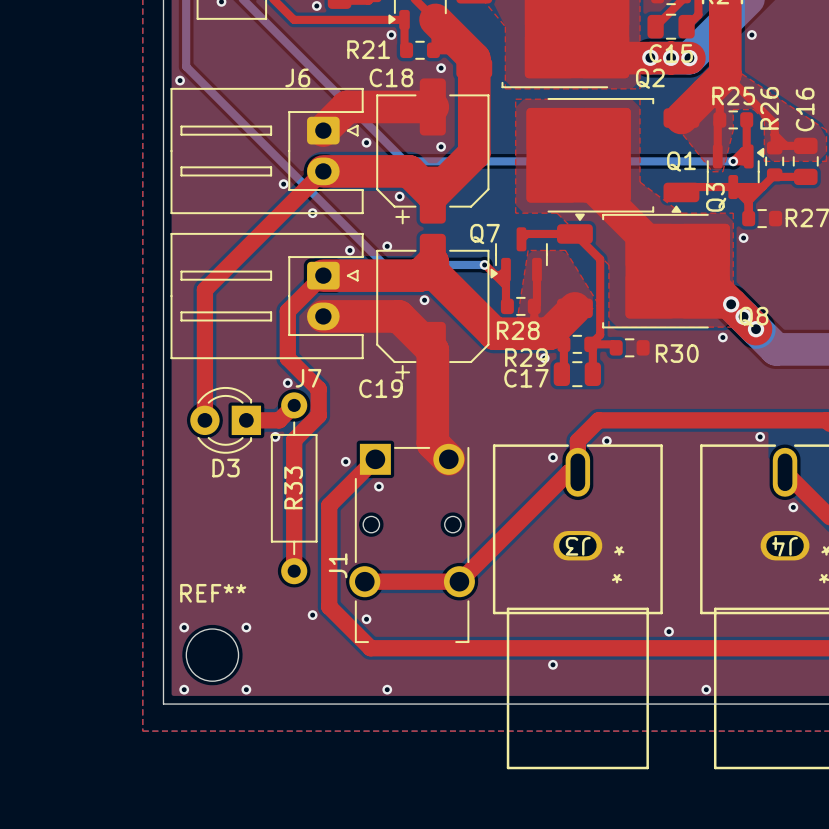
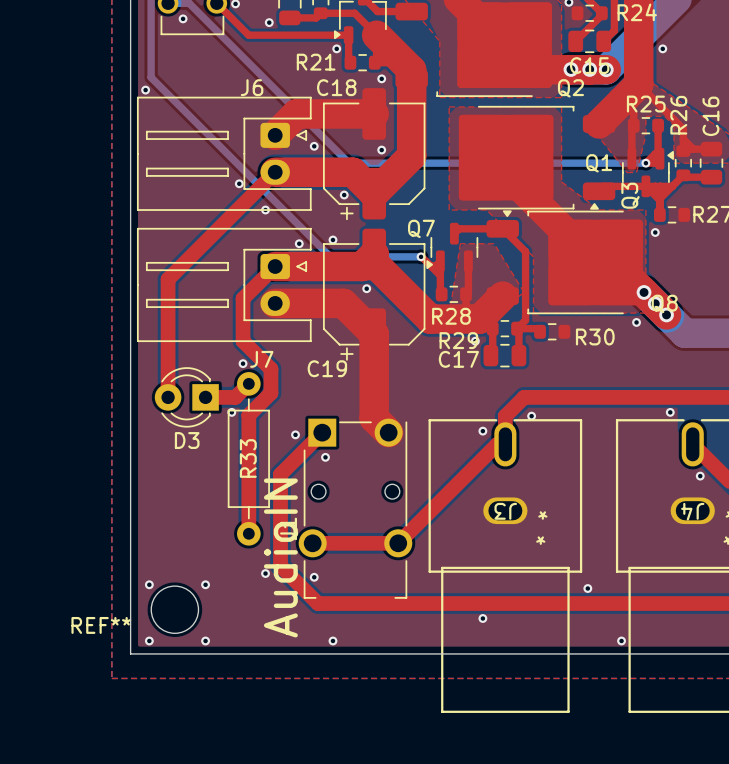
REF** name position: REF** (213, 593) -> REF** (101, 625)
text: none -> AudioIN (280, 557)

